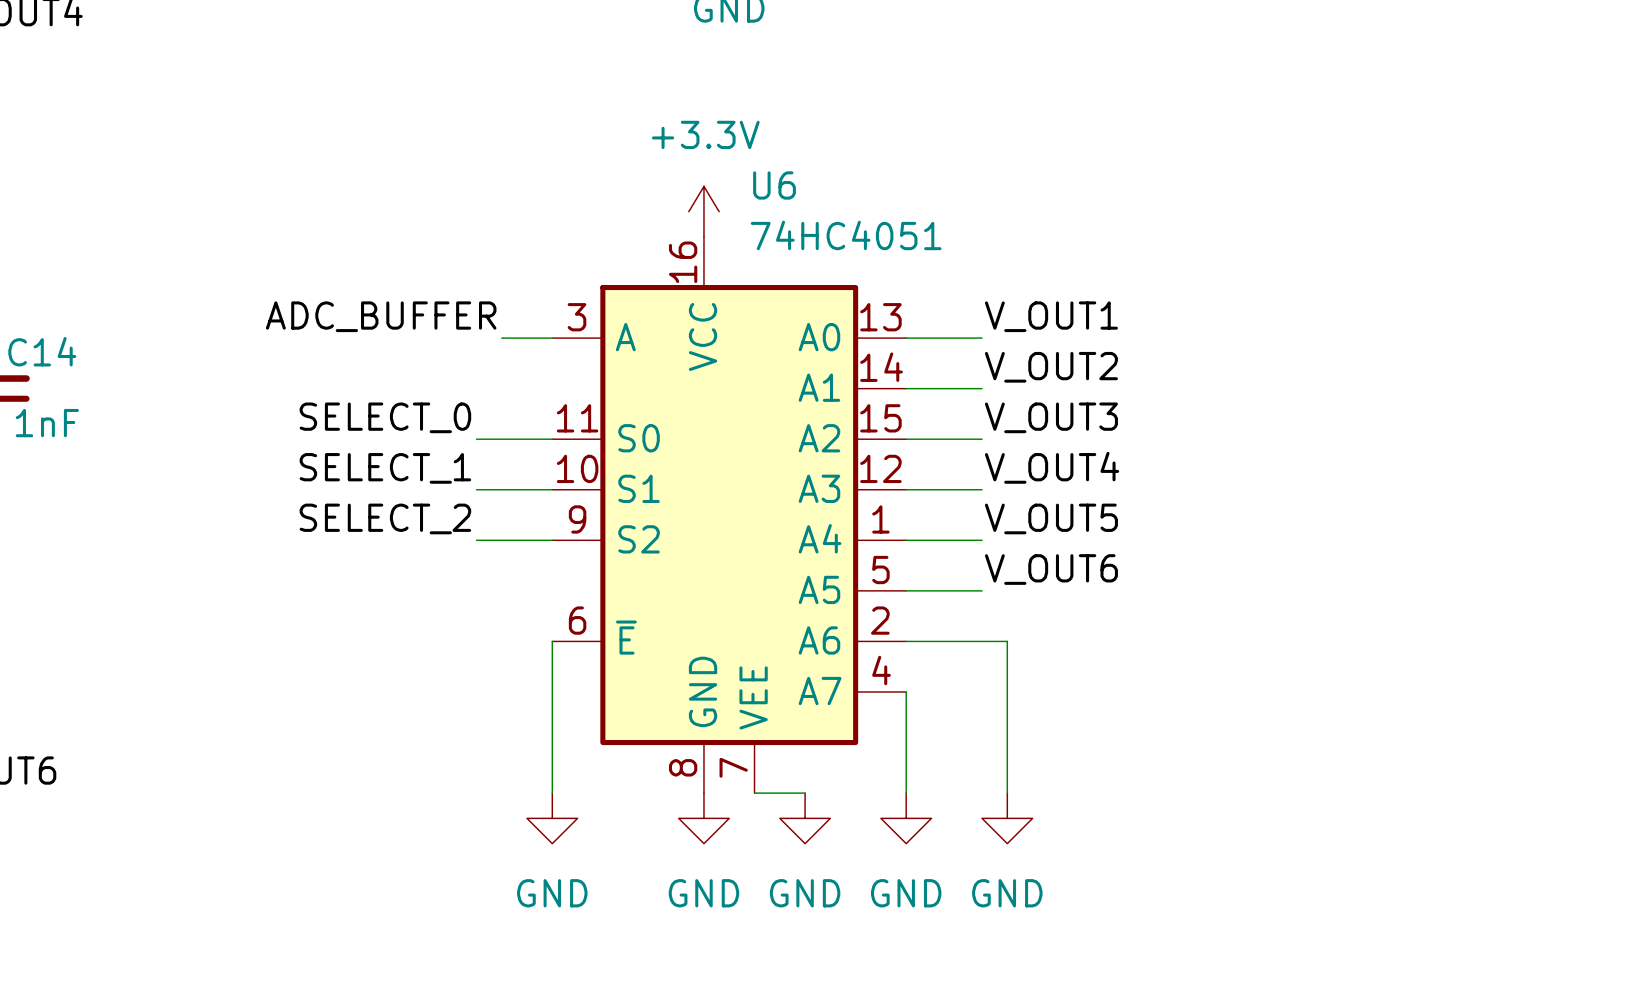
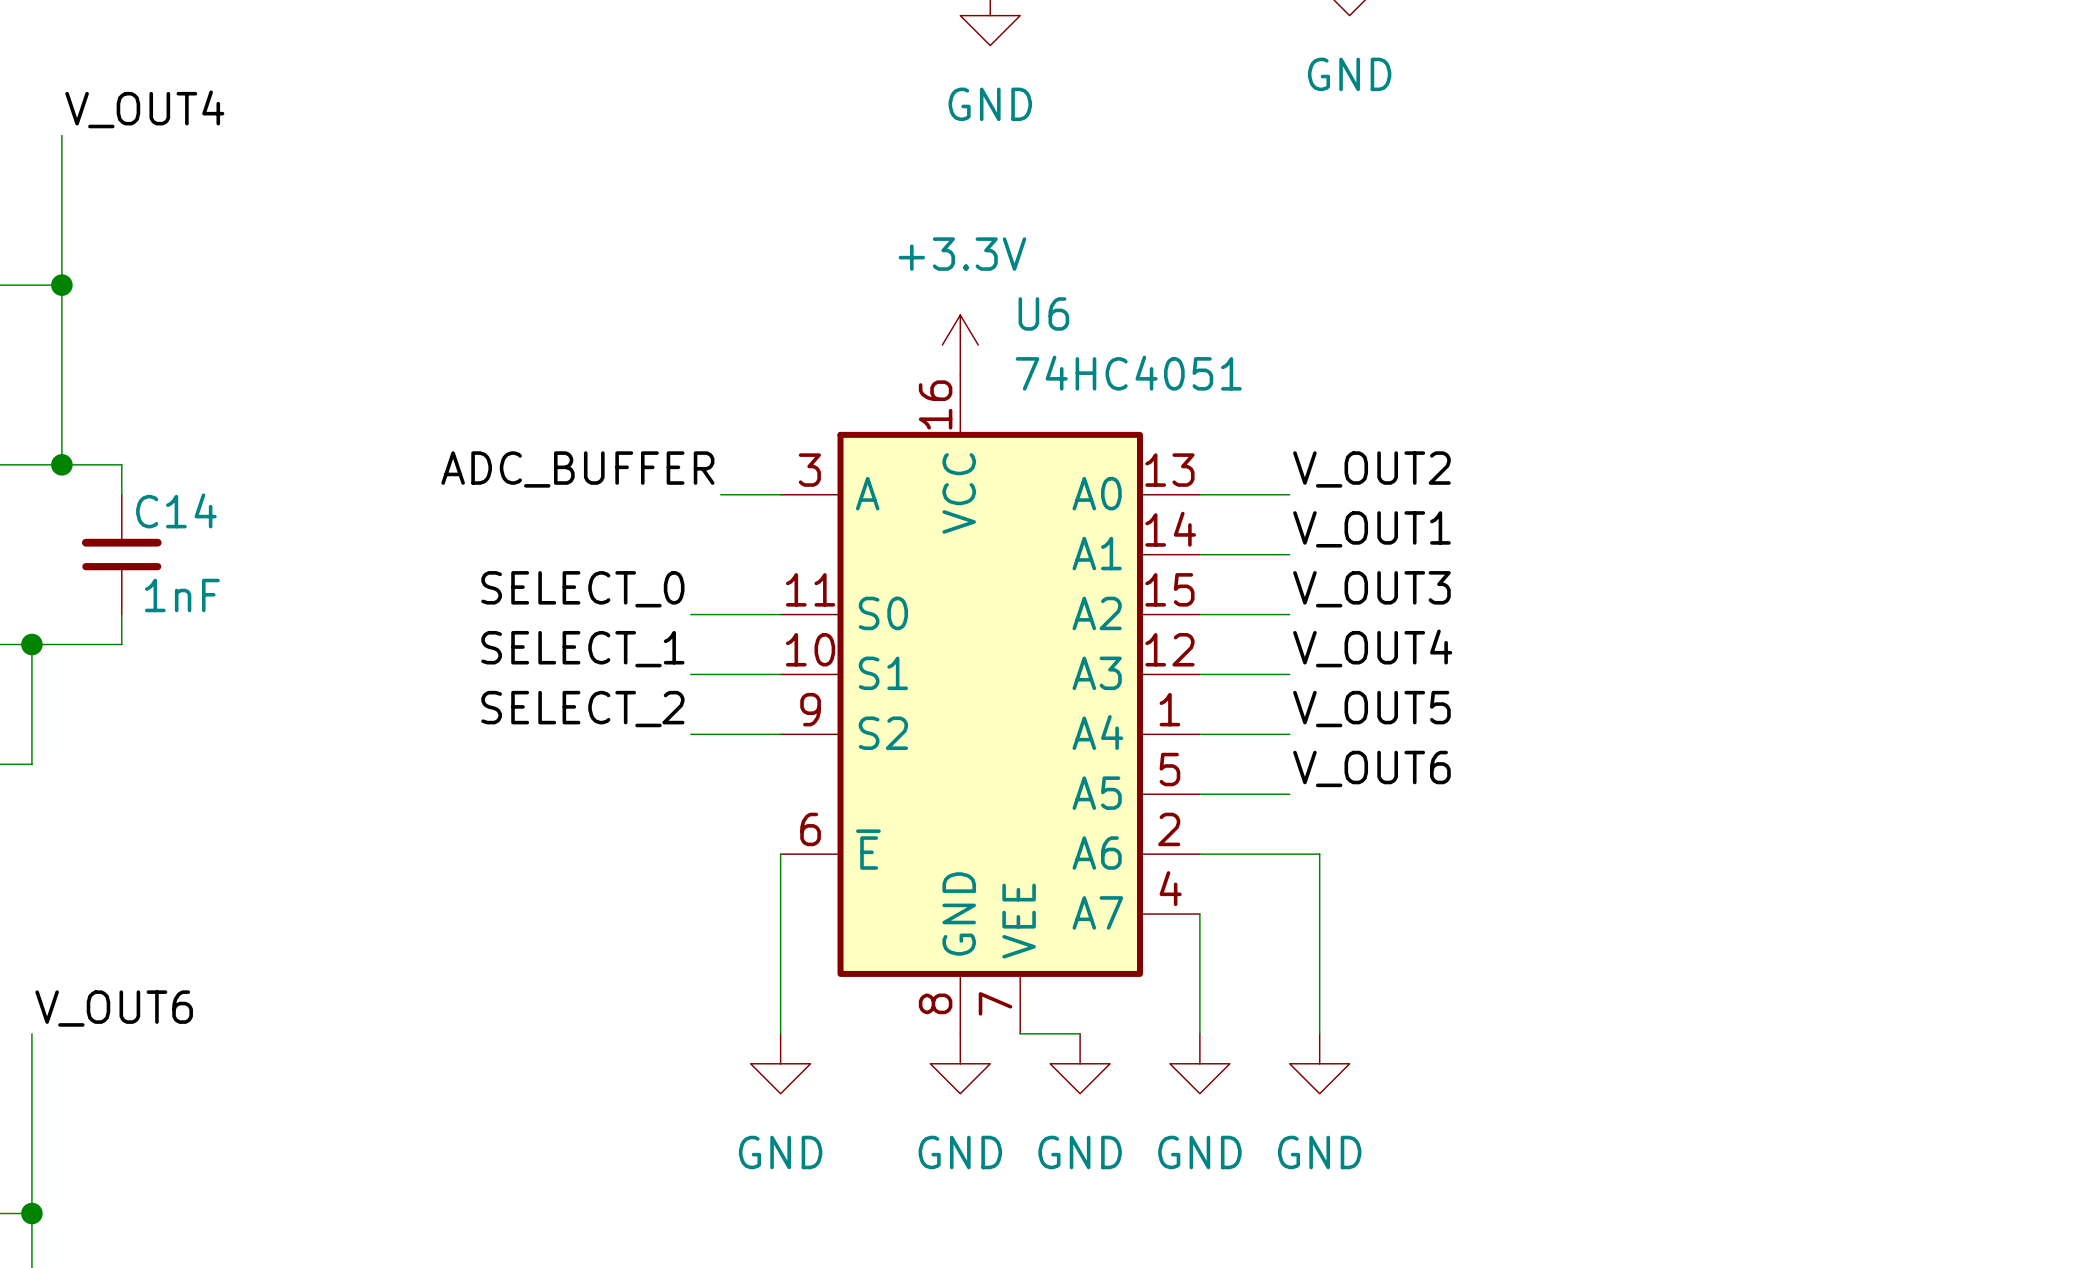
label: V_OUT1 (1051, 316) -> V_OUT2 (1371, 469)
label: V_OUT2 (1051, 367) -> V_OUT1 (1371, 529)

